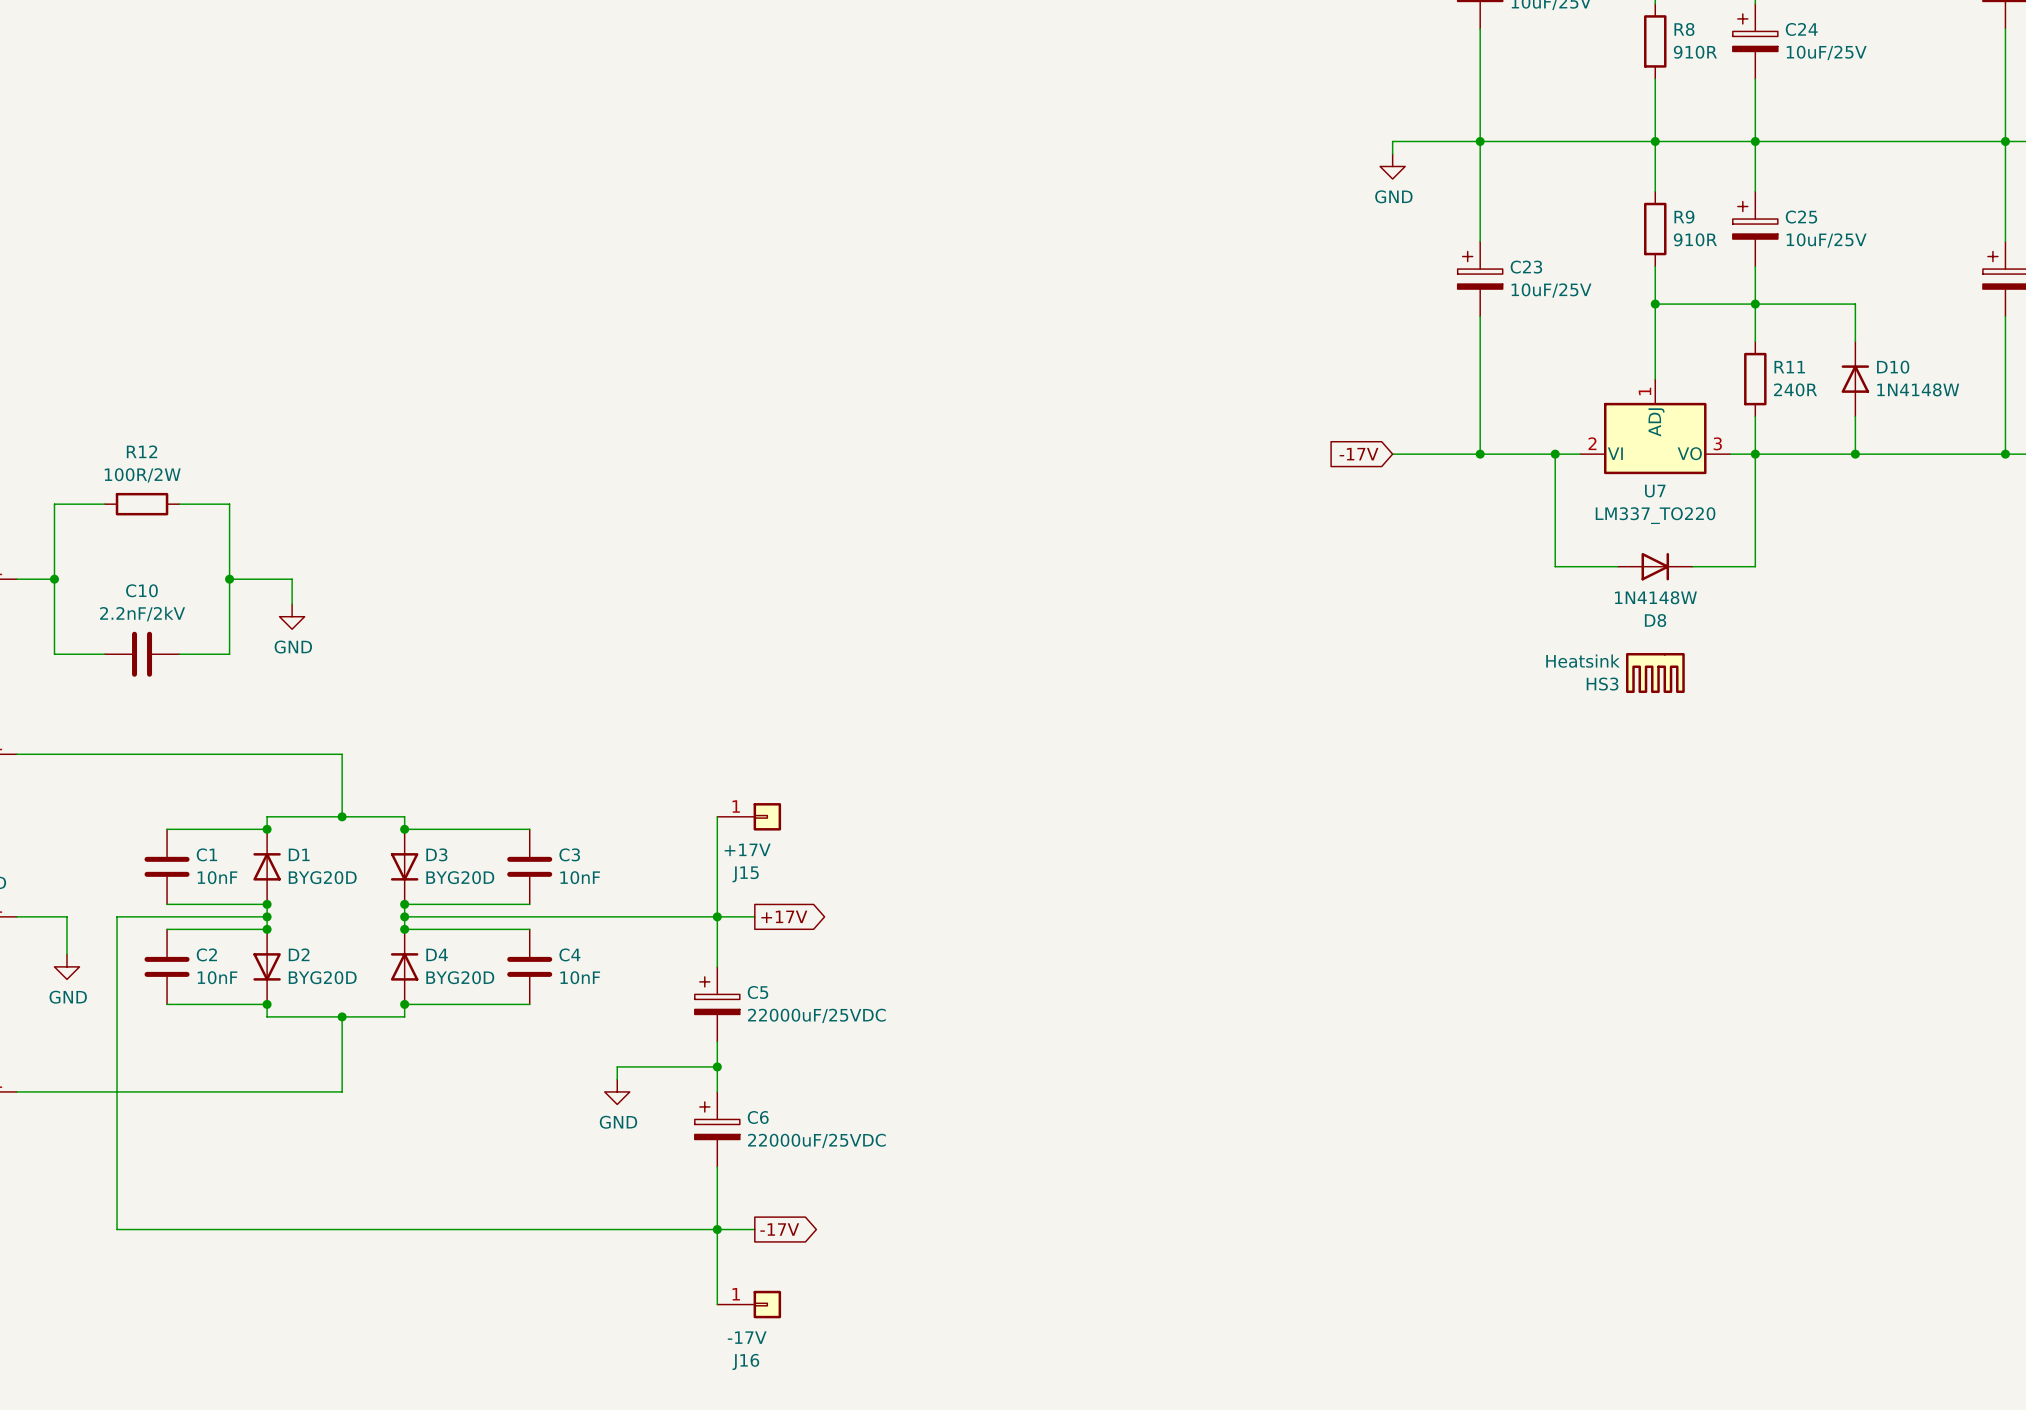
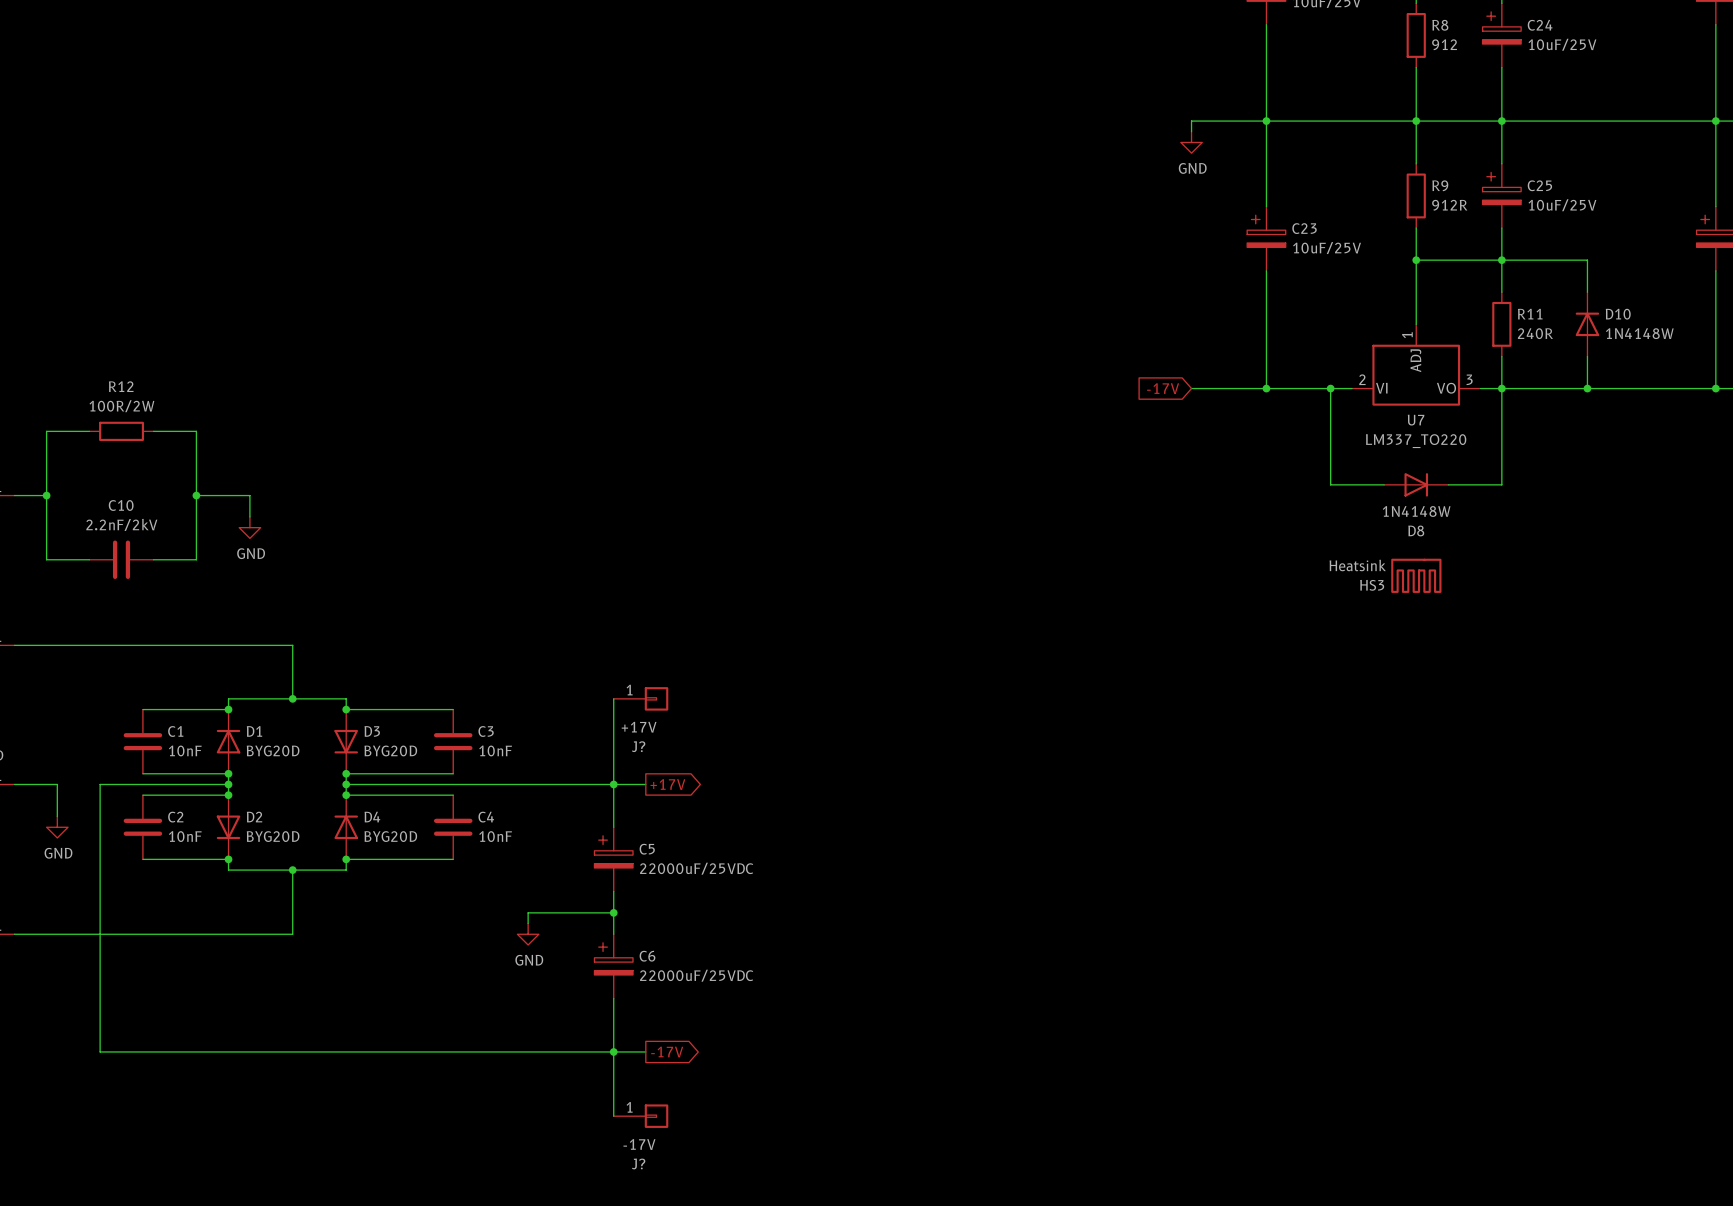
R8 value: 910R (1695, 52) -> 912 (1444, 44)
R9 value: 910R (1695, 239) -> 912R (1449, 205)
J15 name: J15 (745, 874) -> J? (638, 746)
J16 name: J16 (745, 1361) -> J? (638, 1163)

